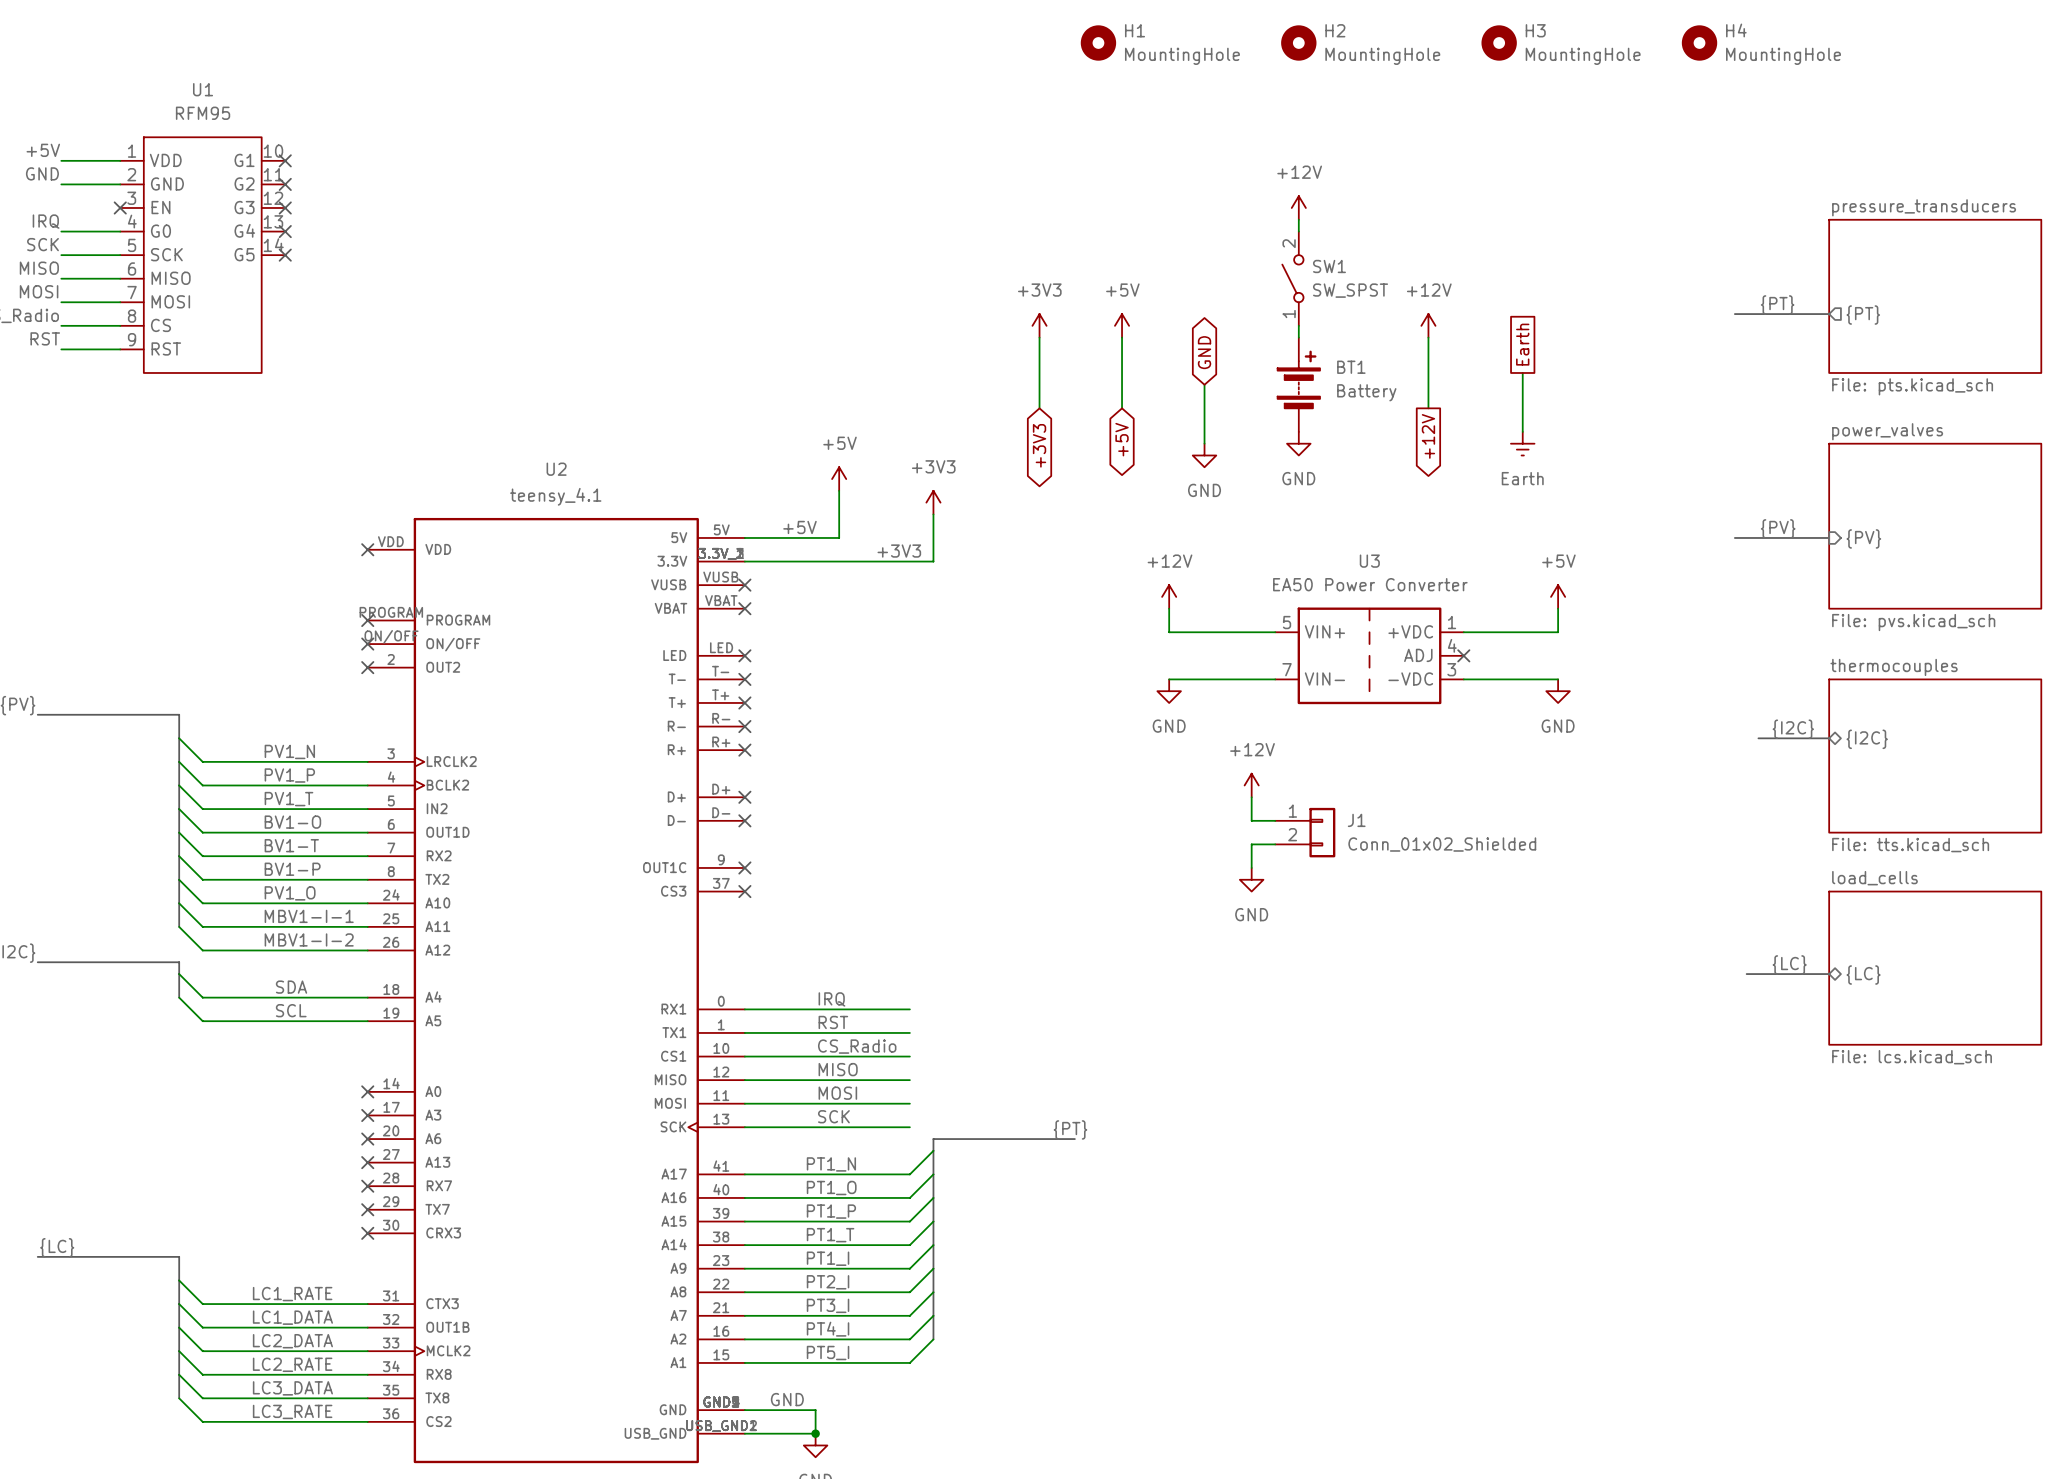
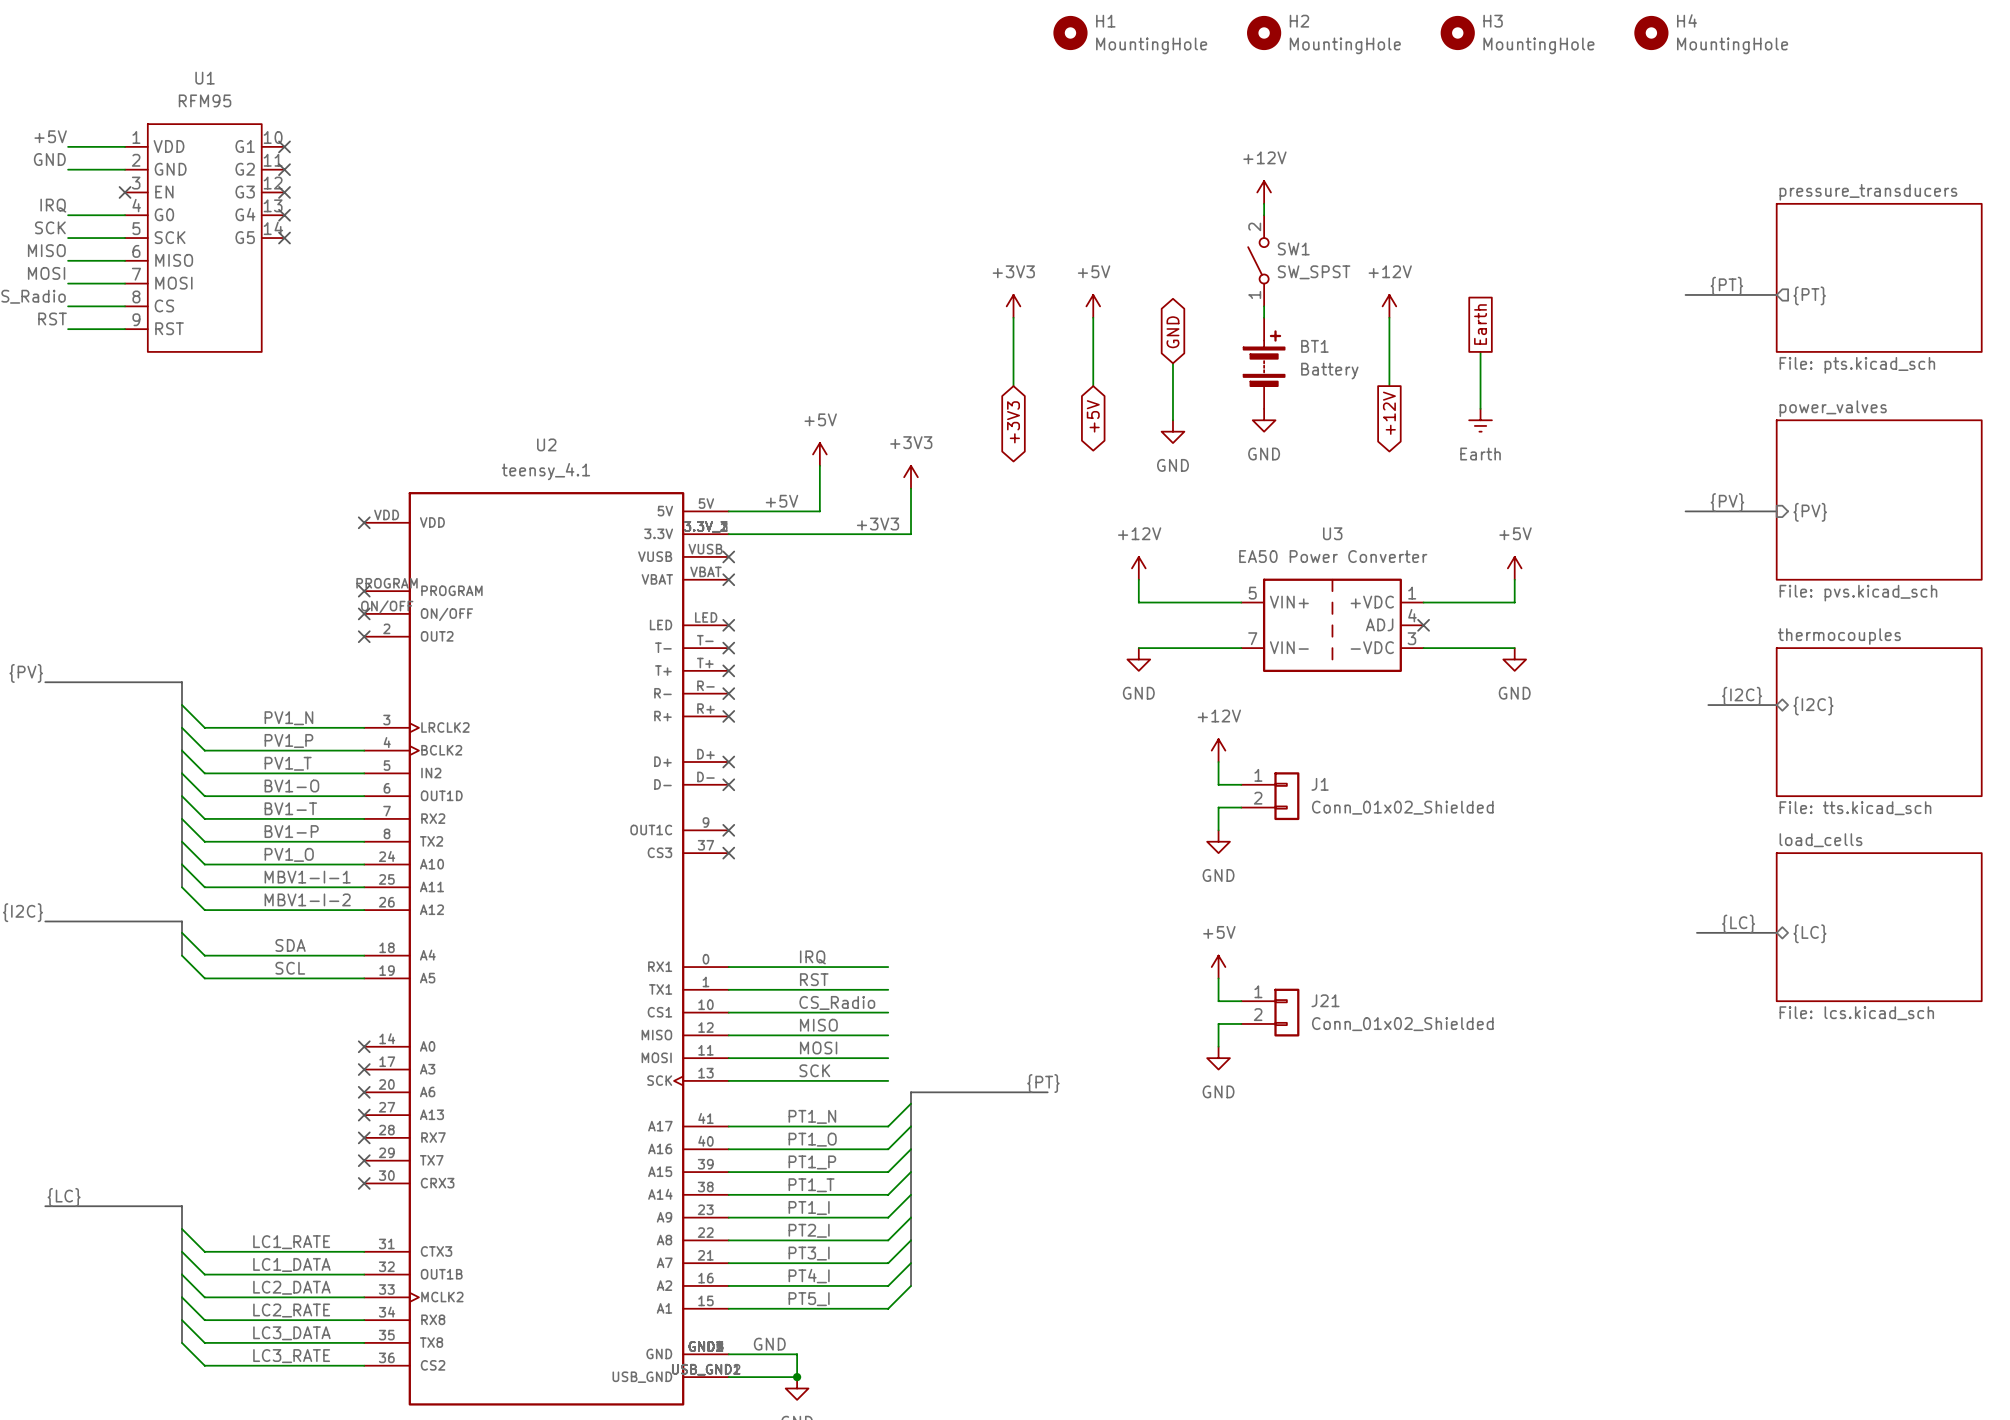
power symbol: none -> +5V (1218, 967)
wire: none -> (1218, 978) (1218, 1001) (1241, 1001)
J21: none -> Conn_01x02_Shielded (1270, 1012)
wire: none -> (1241, 1023) (1218, 1023) (1218, 1046)
power symbol: none -> GND (1218, 1058)

